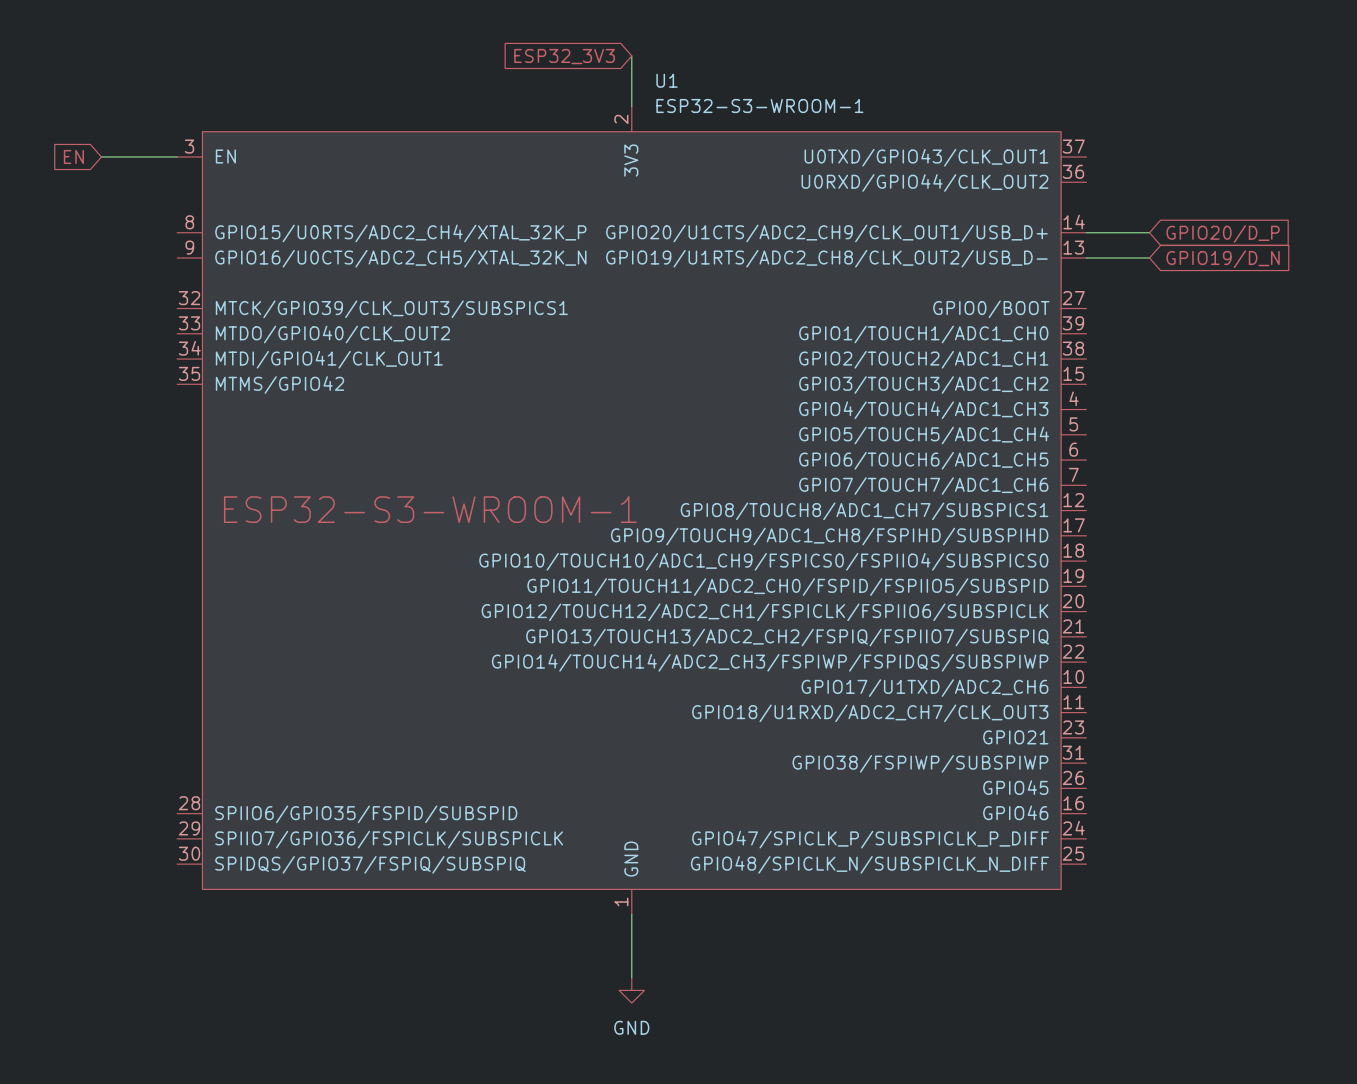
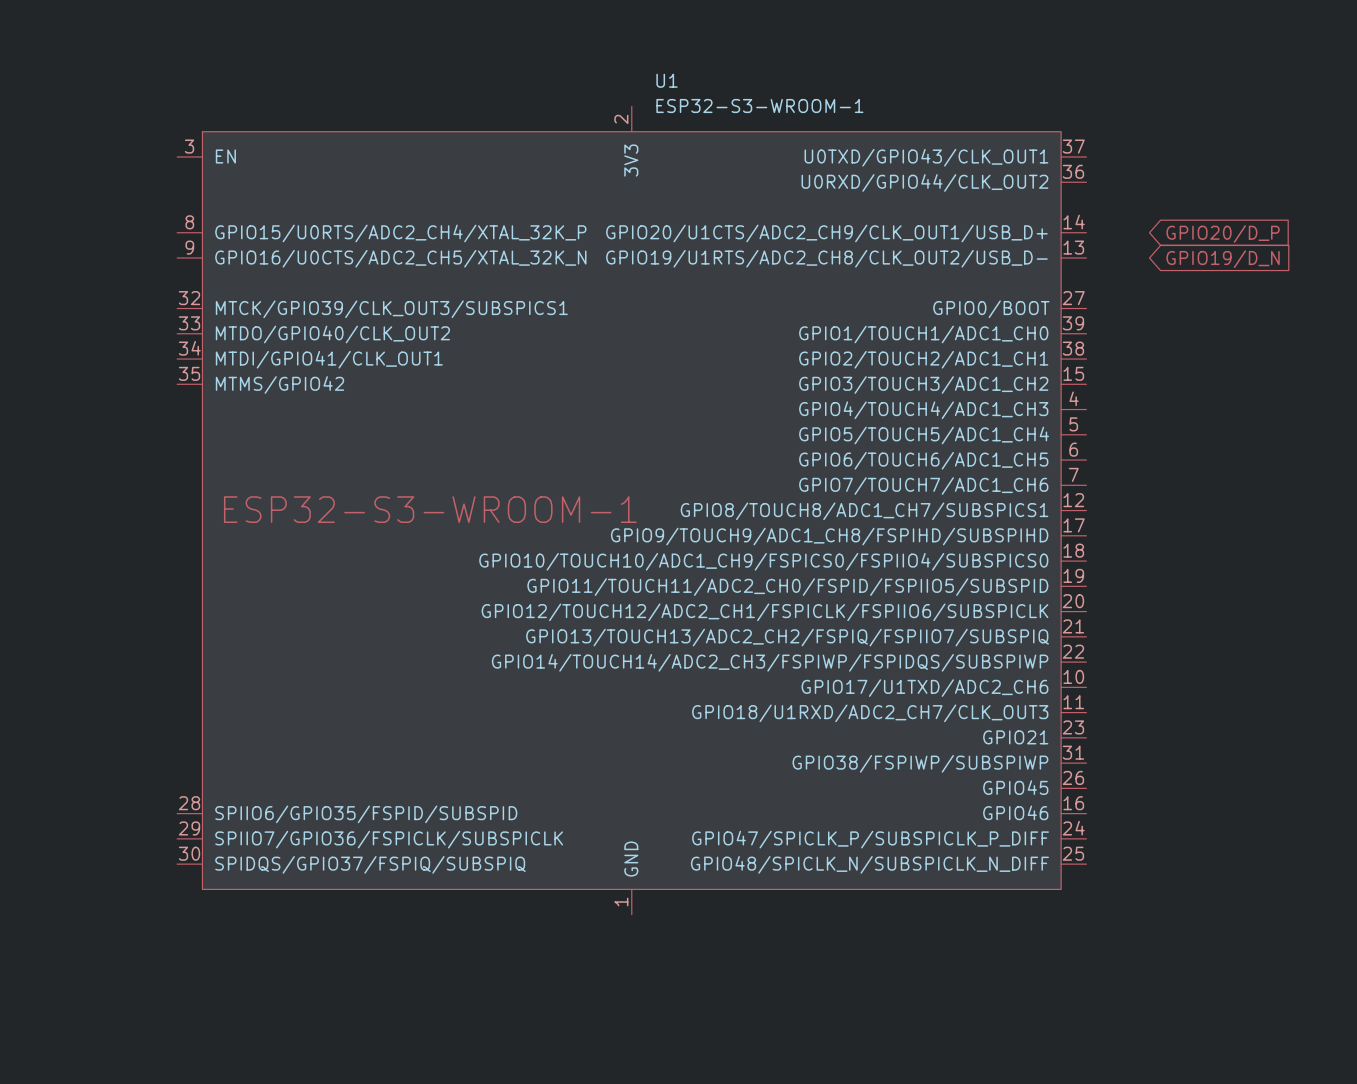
wire: (631, 55) (631, 106) -> none
global label: ESP32_3V3 (564, 56) -> none
global label: EN (73, 156) -> none
wire: (101, 156) (177, 156) -> none
wire: (1086, 232) (1149, 232) -> none
wire: (1086, 258) (1149, 258) -> none
wire: (631, 914) (631, 977) -> none
power symbol: GND (631, 990) -> none

